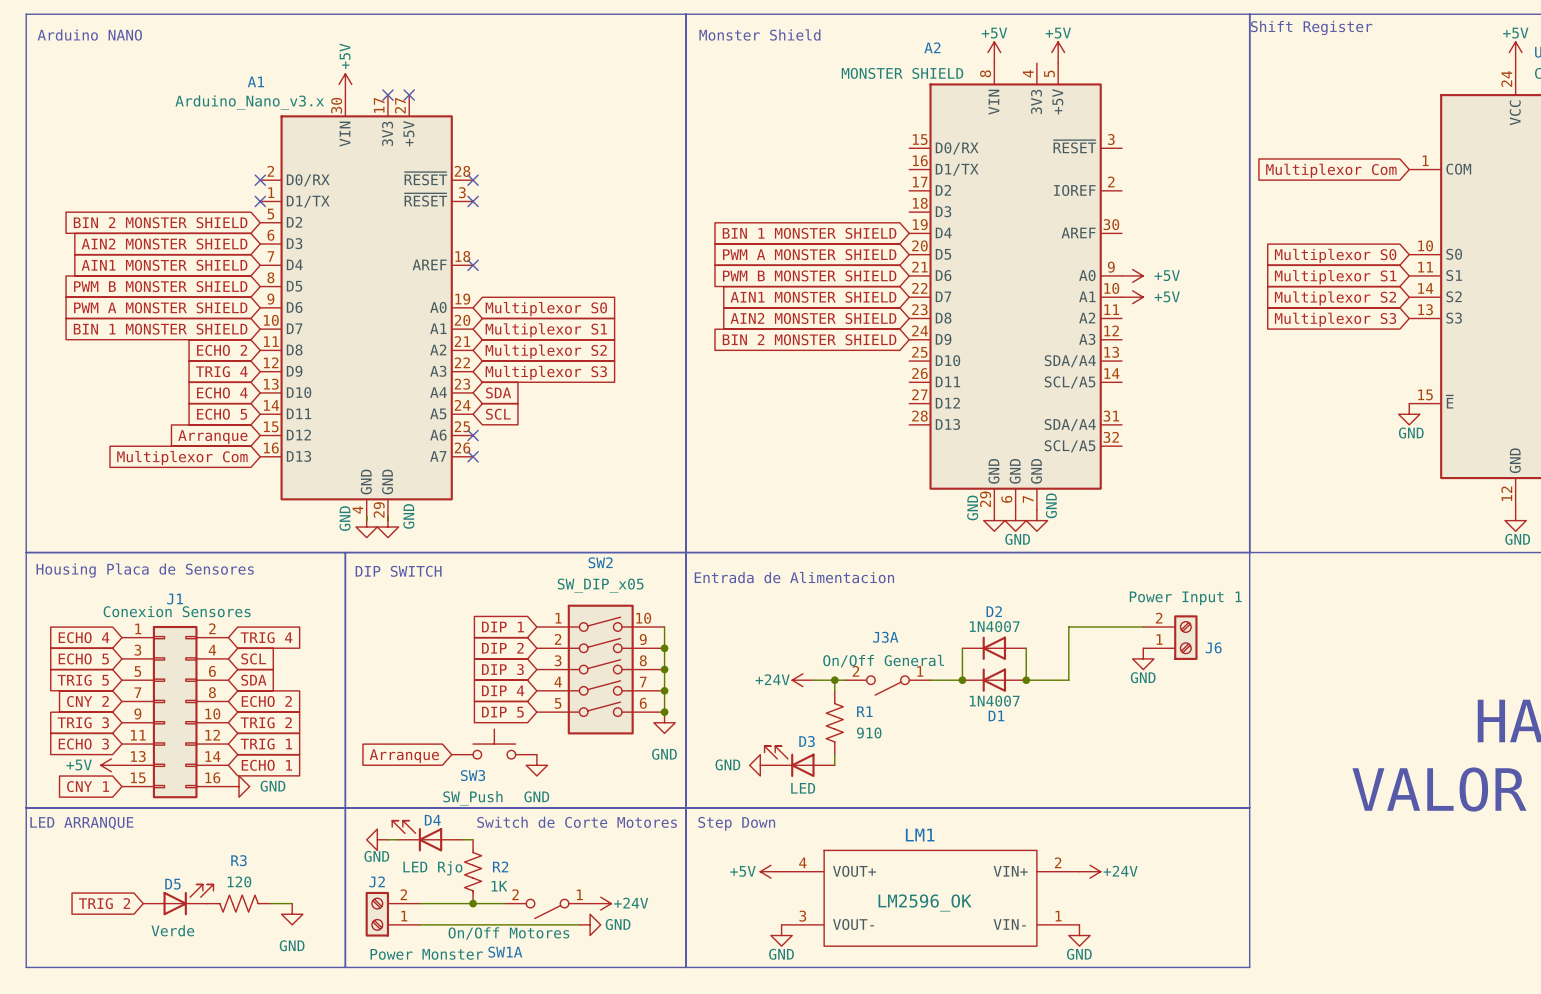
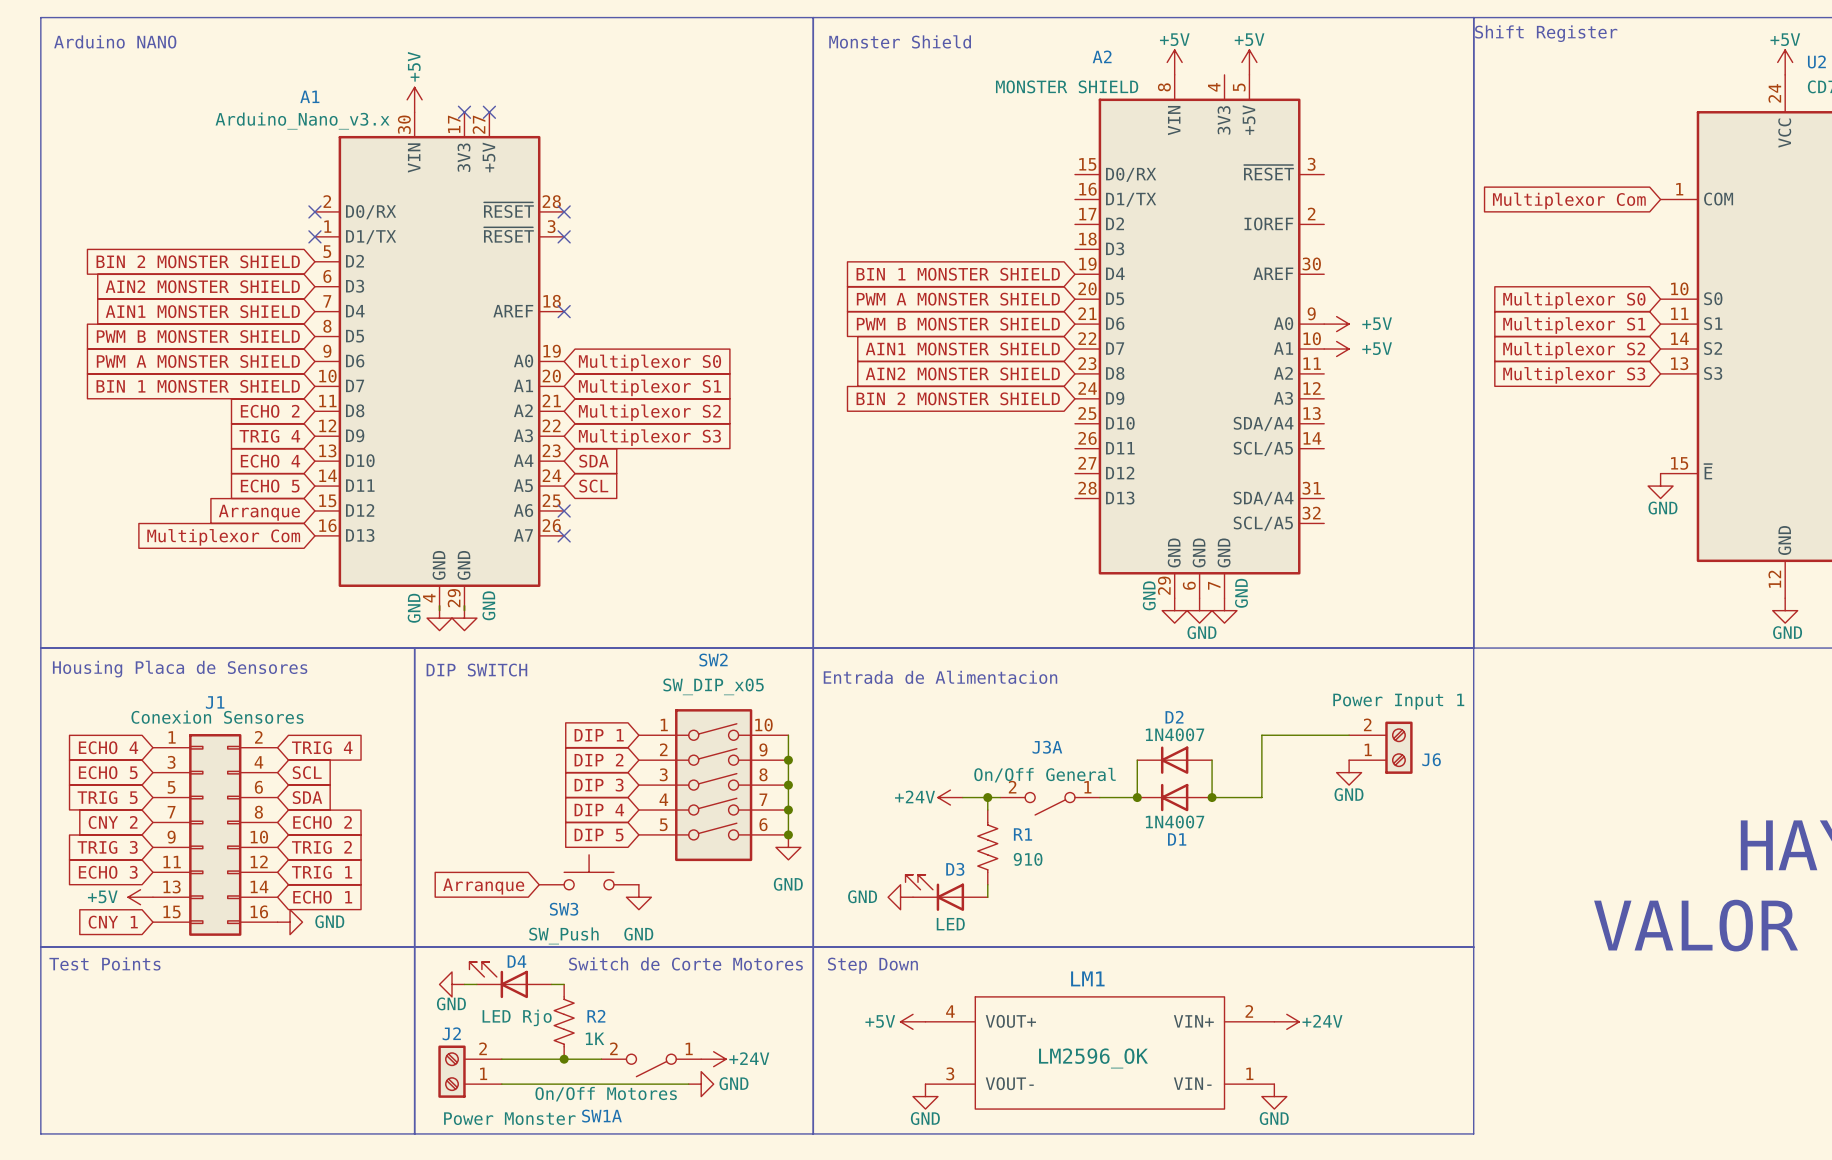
text: LED ARRANQUE (81, 823) -> Test Points (104, 963)
D5: Verde (178, 899) -> none
global label: TRIG 2 (104, 903) -> none
R3: 120 (239, 903) -> none
wire: (270, 903) (292, 903) -> none
power symbol: GND (292, 914) -> none

